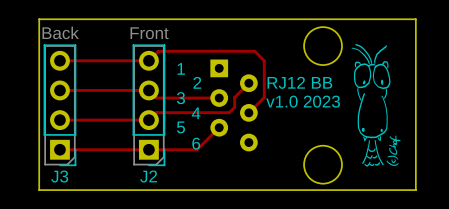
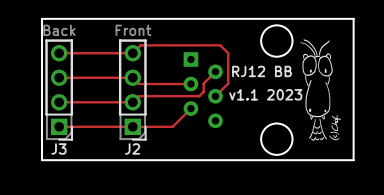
text: 1 (181, 68) -> none
text: 2 (197, 82) -> none
text: 3 (180, 98) -> none
text: v1.0 2023 (303, 101) -> v1.1 2023 (265, 94)
text: 4 (196, 113) -> none
text: 5 (180, 127) -> none
text: 6 (196, 143) -> none

